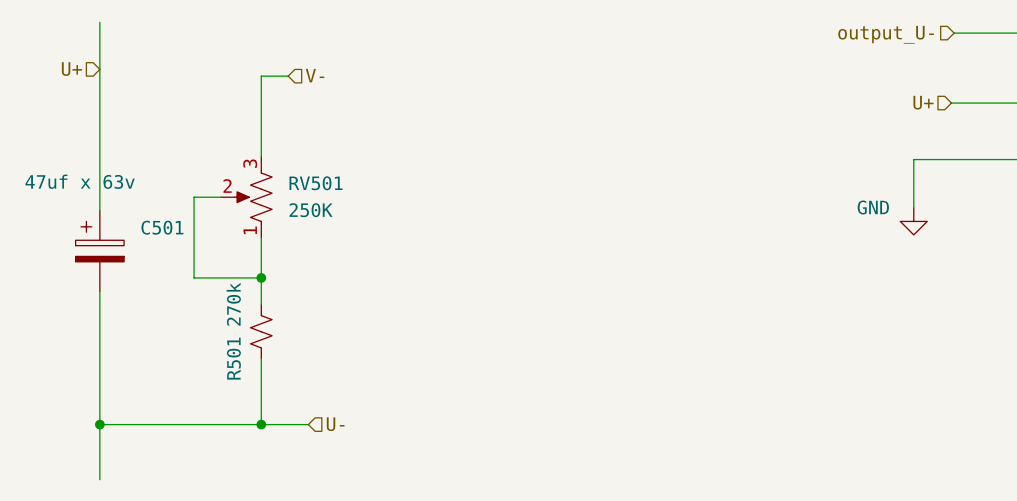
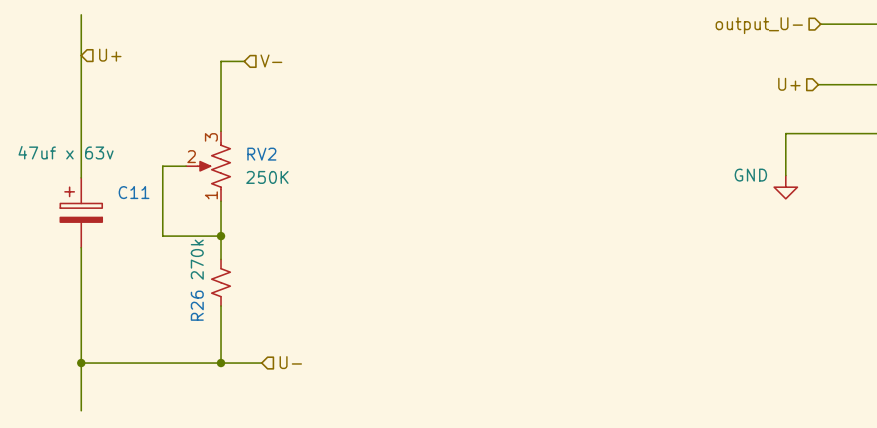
hierarchical label rotation: 0° (71, 69) -> 180° (110, 55)
hierarchical label position: U+ (71, 69) -> U+ (110, 55)
RV501 name: RV501 (316, 183) -> RV2 (261, 154)
C501 name: C501 (162, 227) -> C11 (134, 192)
R501 name: R501 (233, 358) -> R26 (197, 305)

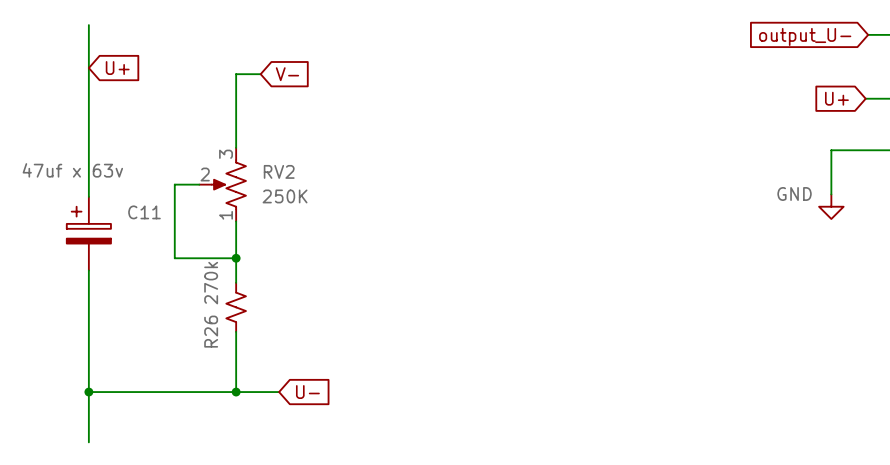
hierarchical label: output_U- (759, 25) -> none
global label: none -> output_U- (805, 36)
global label: none -> U+ (117, 68)
hierarchical label: U+ (110, 55) -> none
hierarchical label: V- (271, 60) -> none
global label: none -> V- (287, 74)
hierarchical label: U+ (789, 84) -> none
global label: none -> U+ (836, 98)
hierarchical label: U- (290, 362) -> none
global label: none -> U- (307, 392)

